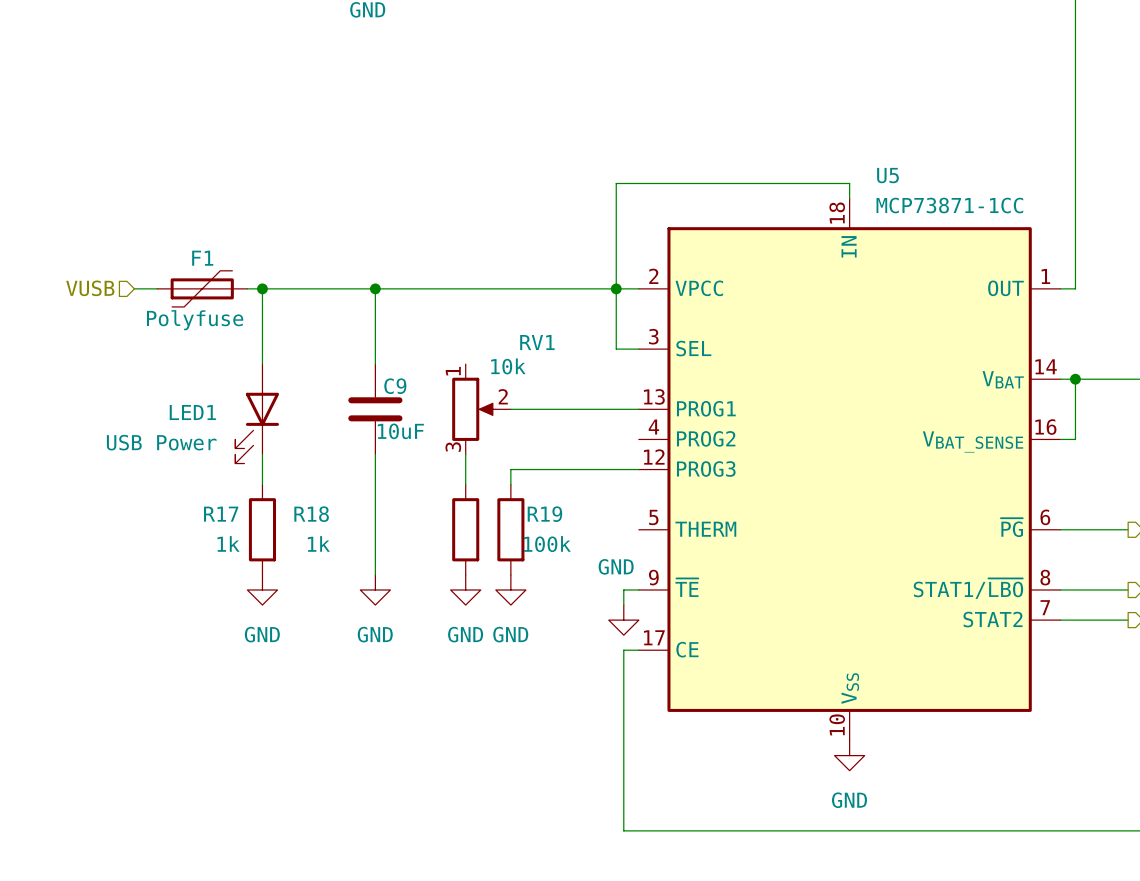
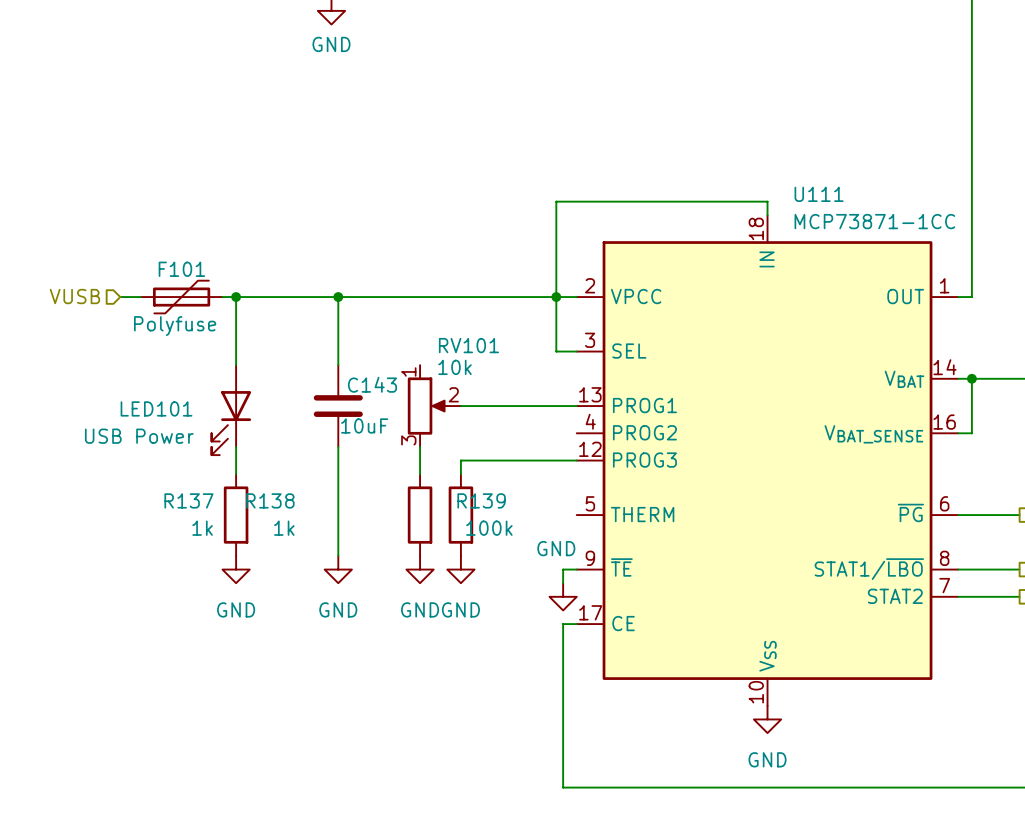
U5 name: U5 (887, 175) -> U111 (819, 194)
F1 name: F1 (202, 258) -> F101 (181, 269)
RV1 name: RV1 (537, 342) -> RV101 (468, 345)
C9 name: C9 (395, 386) -> C143 (372, 384)
LED1 name: LED1 (192, 412) -> LED101 (156, 408)
R17 name: R17 (221, 514) -> R137 (188, 500)
R18 name: R18 (311, 514) -> R138 (270, 500)
R19 name: R19 (544, 514) -> R139 (481, 500)

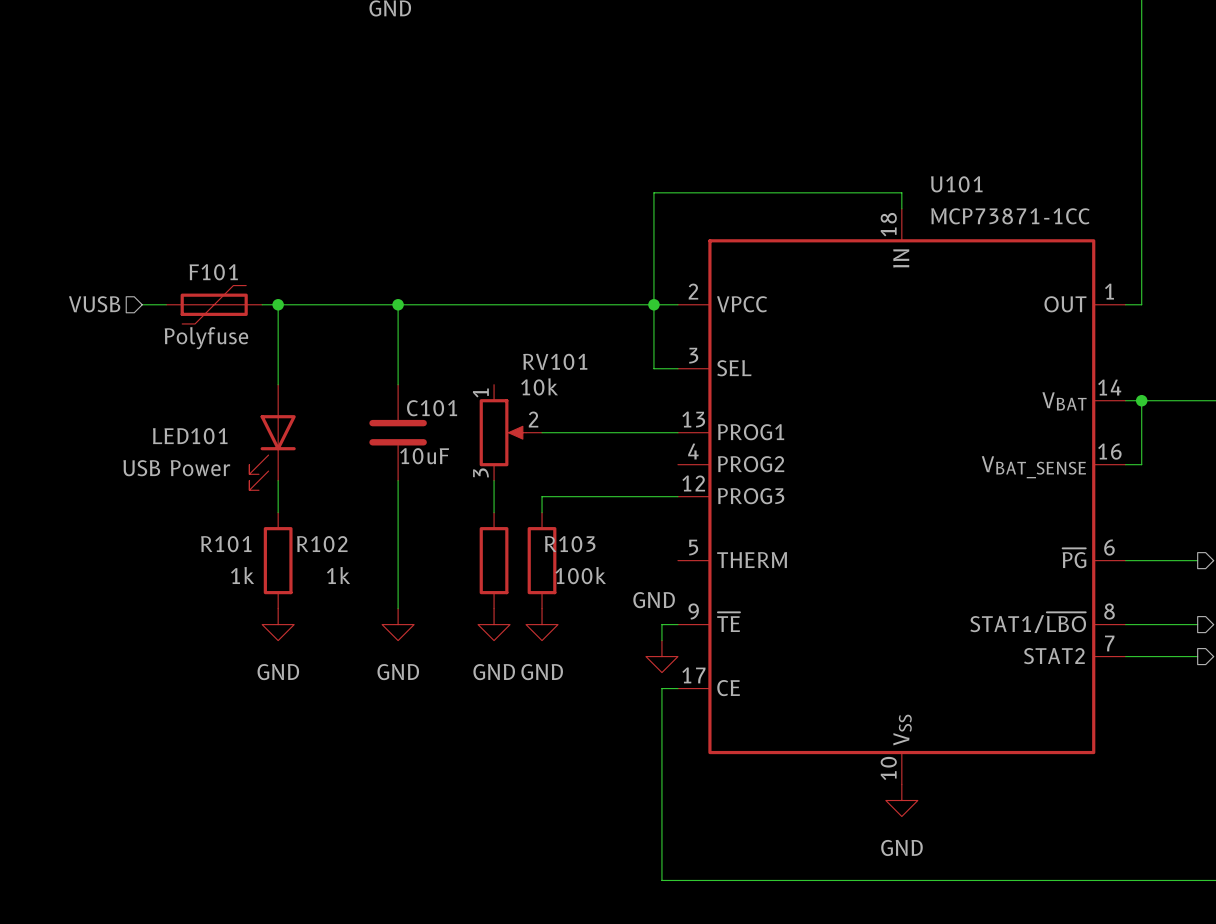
U111 name: U111 (819, 194) -> U101 (956, 184)
C143 name: C143 (372, 384) -> C101 (432, 408)
R137 name: R137 (188, 500) -> R101 (226, 544)
R138 name: R138 (270, 500) -> R102 (322, 544)
R139 name: R139 (481, 500) -> R103 (570, 544)

